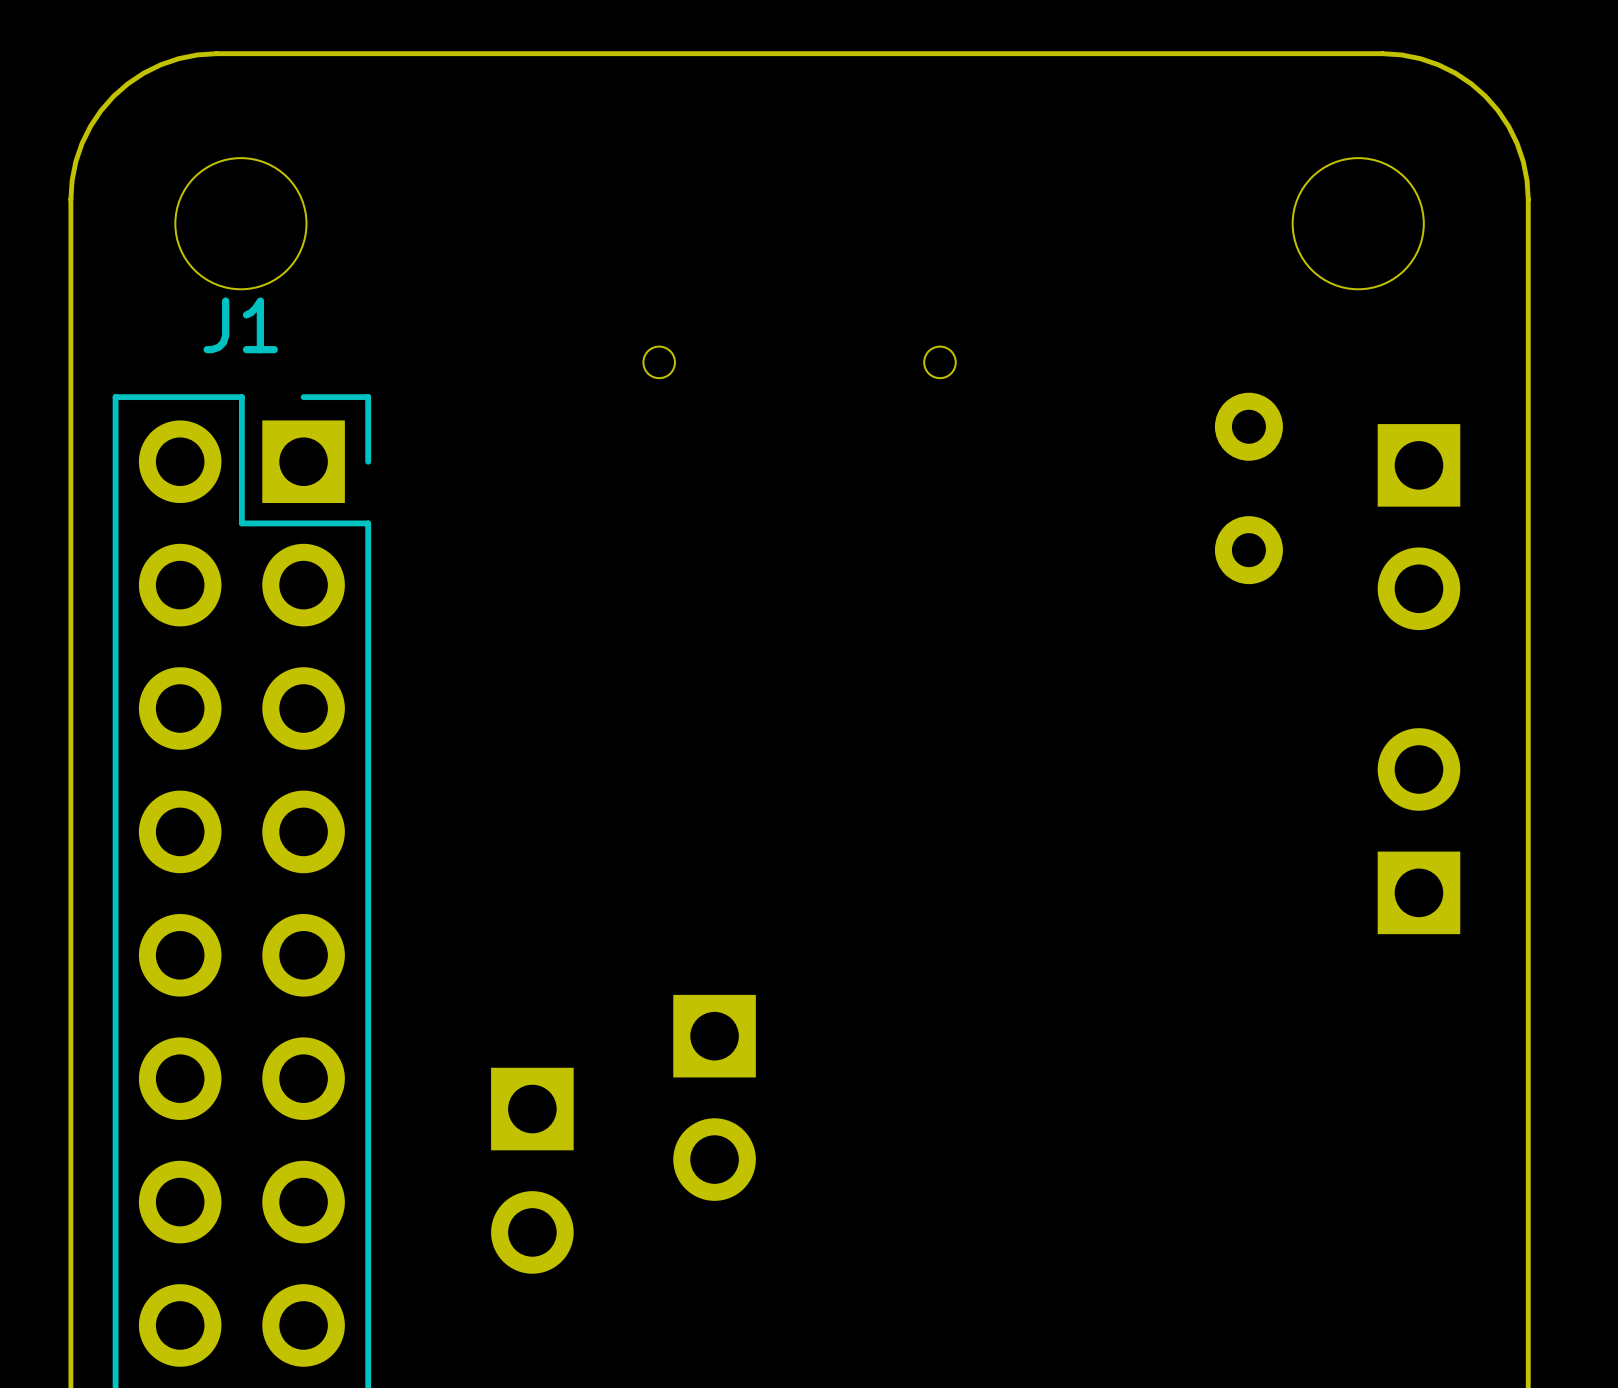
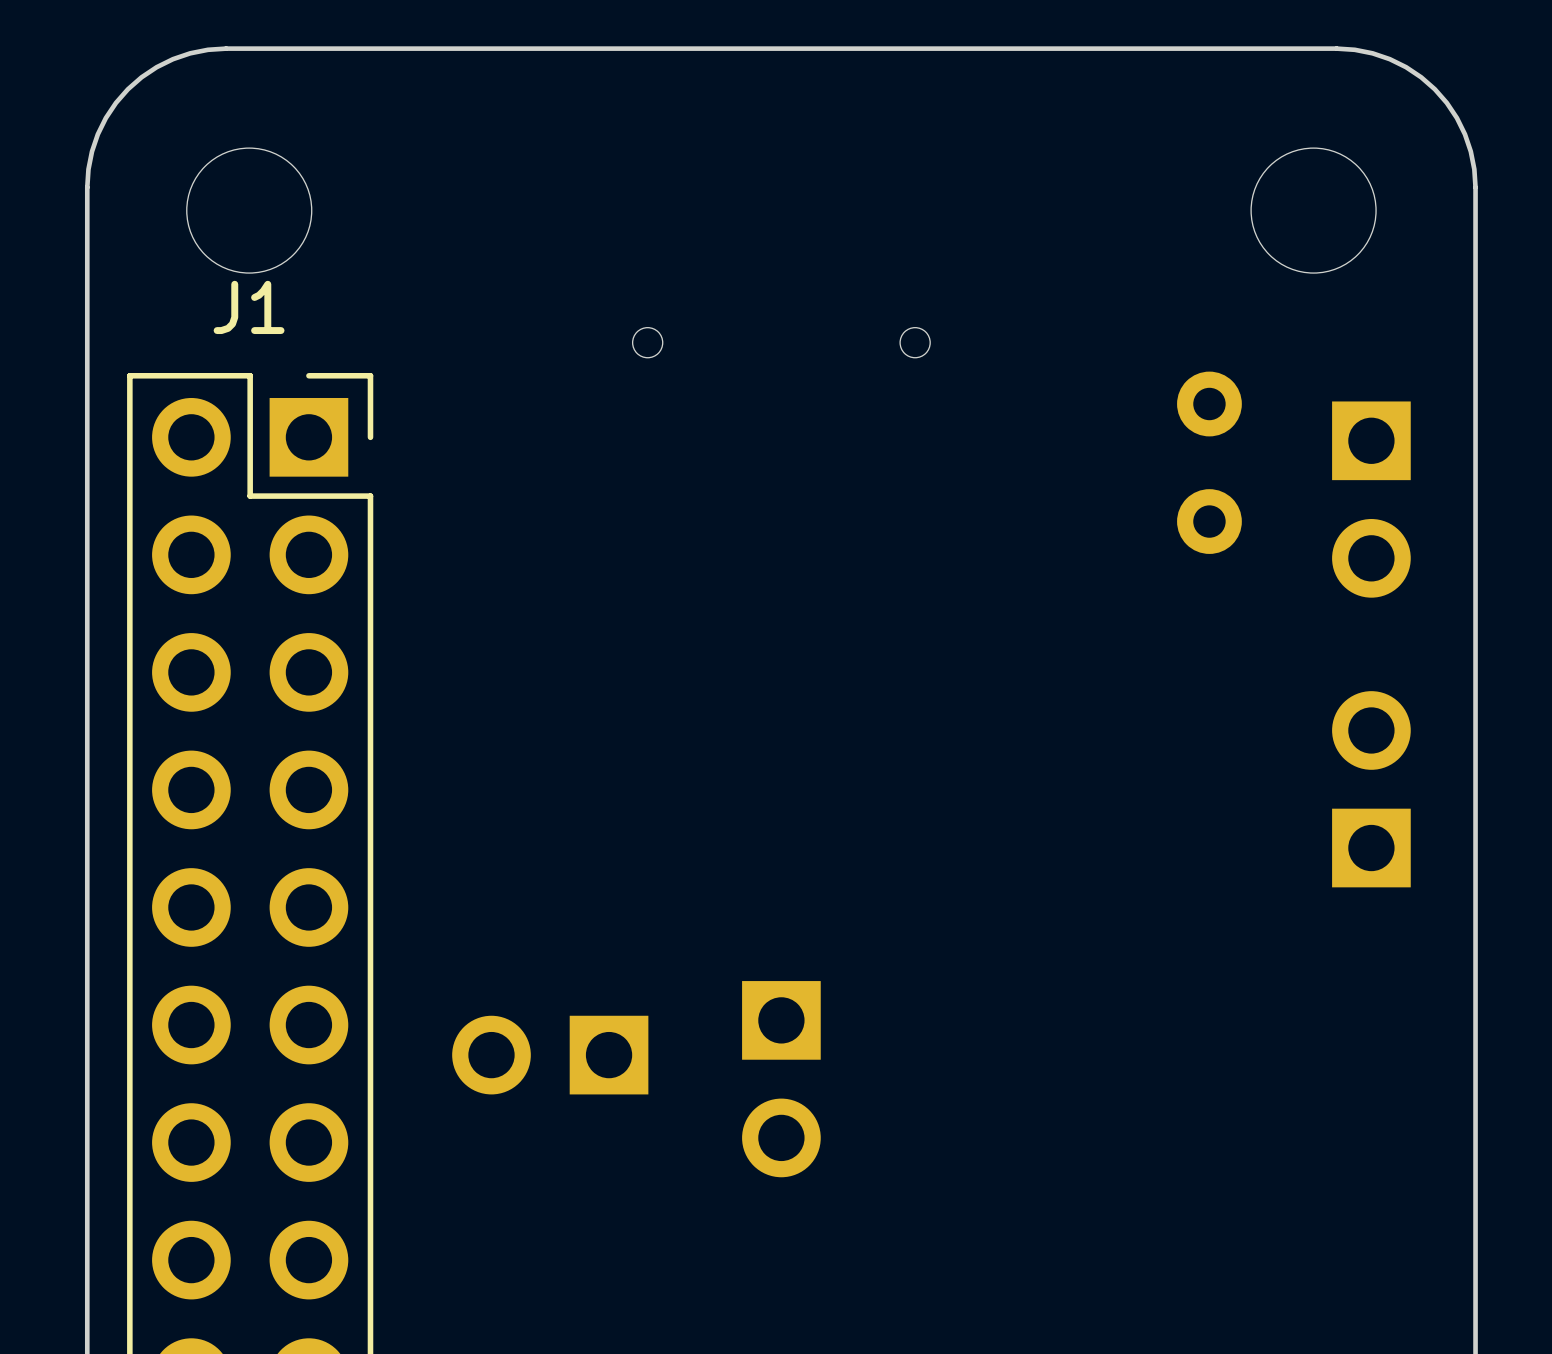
part: (714, 1097) -> none
part: none -> (781, 1079)
part rotation: 0° (532, 1170) -> 90° clockwise (550, 1055)

